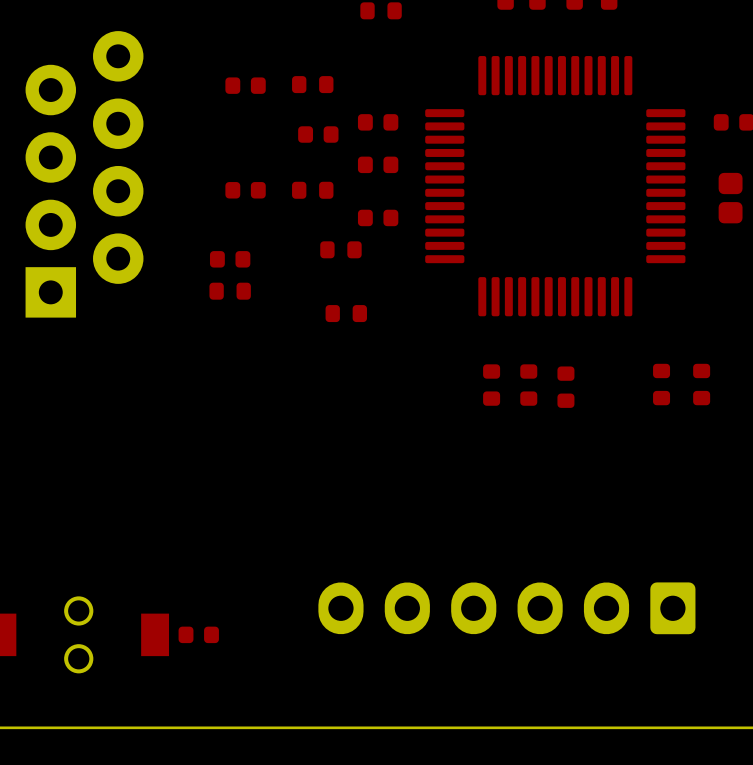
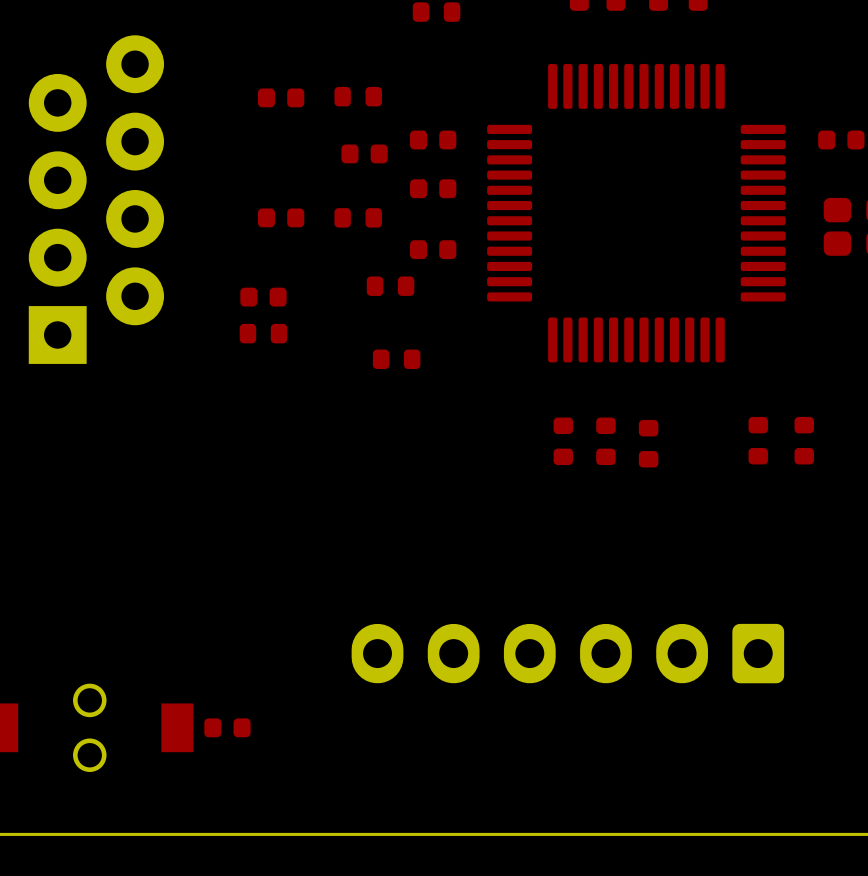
part position: (506, 608) -> (567, 653)

